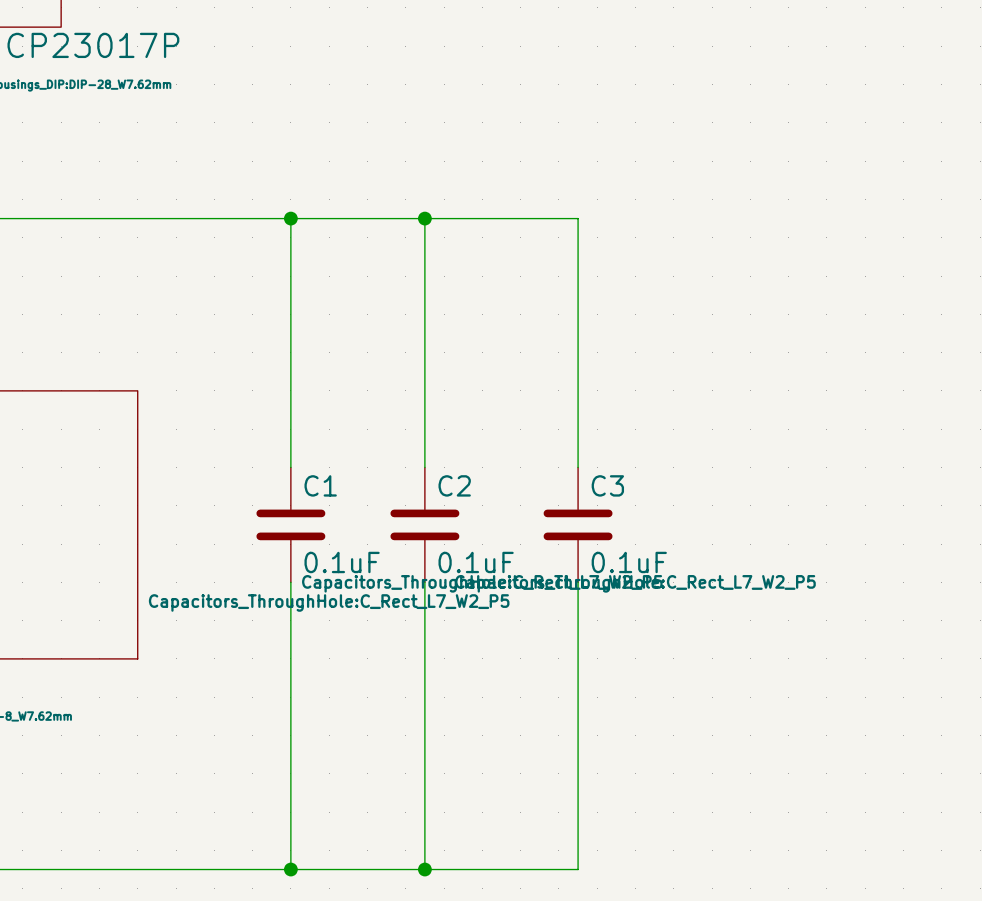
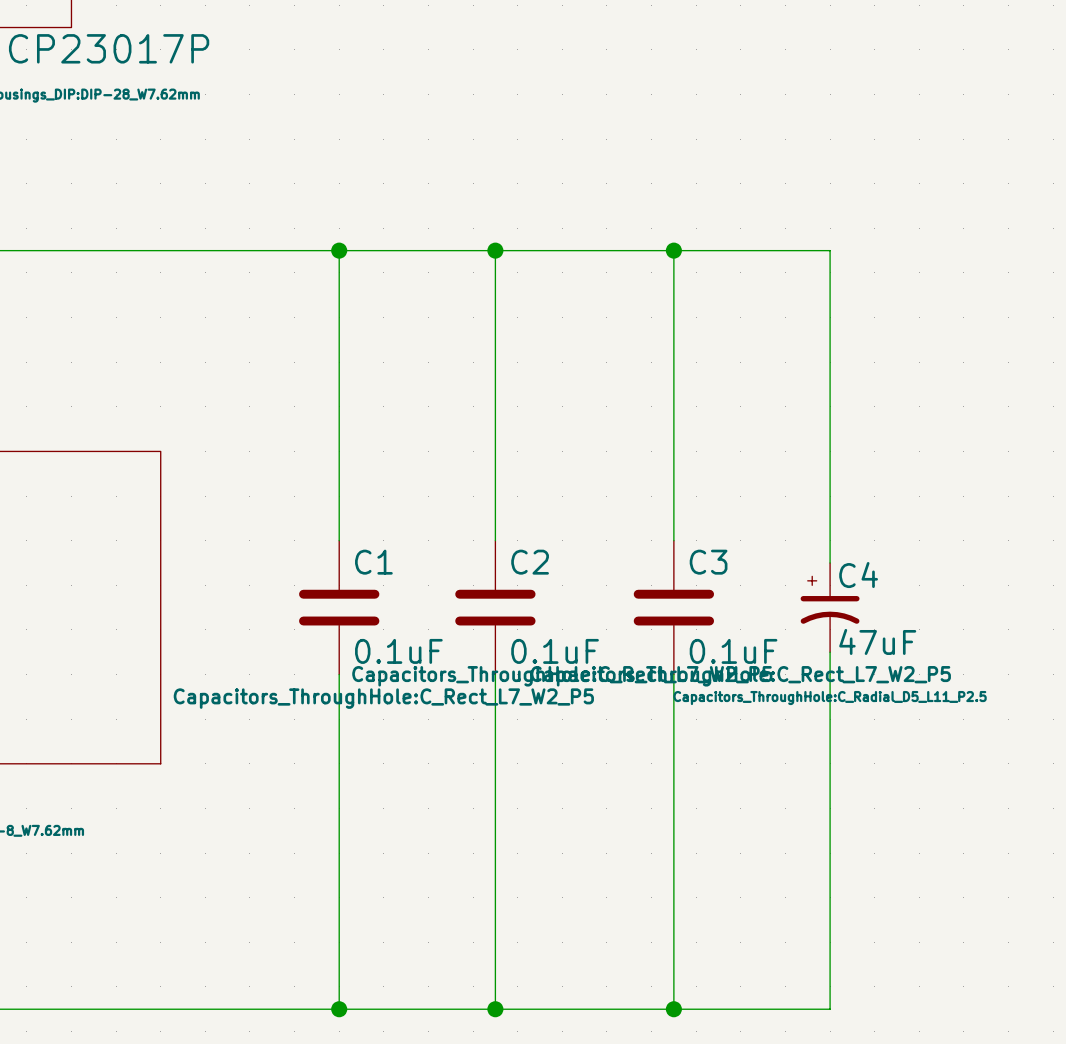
wire: none -> (673, 250) (830, 250) (830, 562)
junction: none -> (673, 250)
C4: none -> 47uF (830, 607)
wire: none -> (830, 652) (830, 1009) (673, 1009)
junction: none -> (673, 1009)

